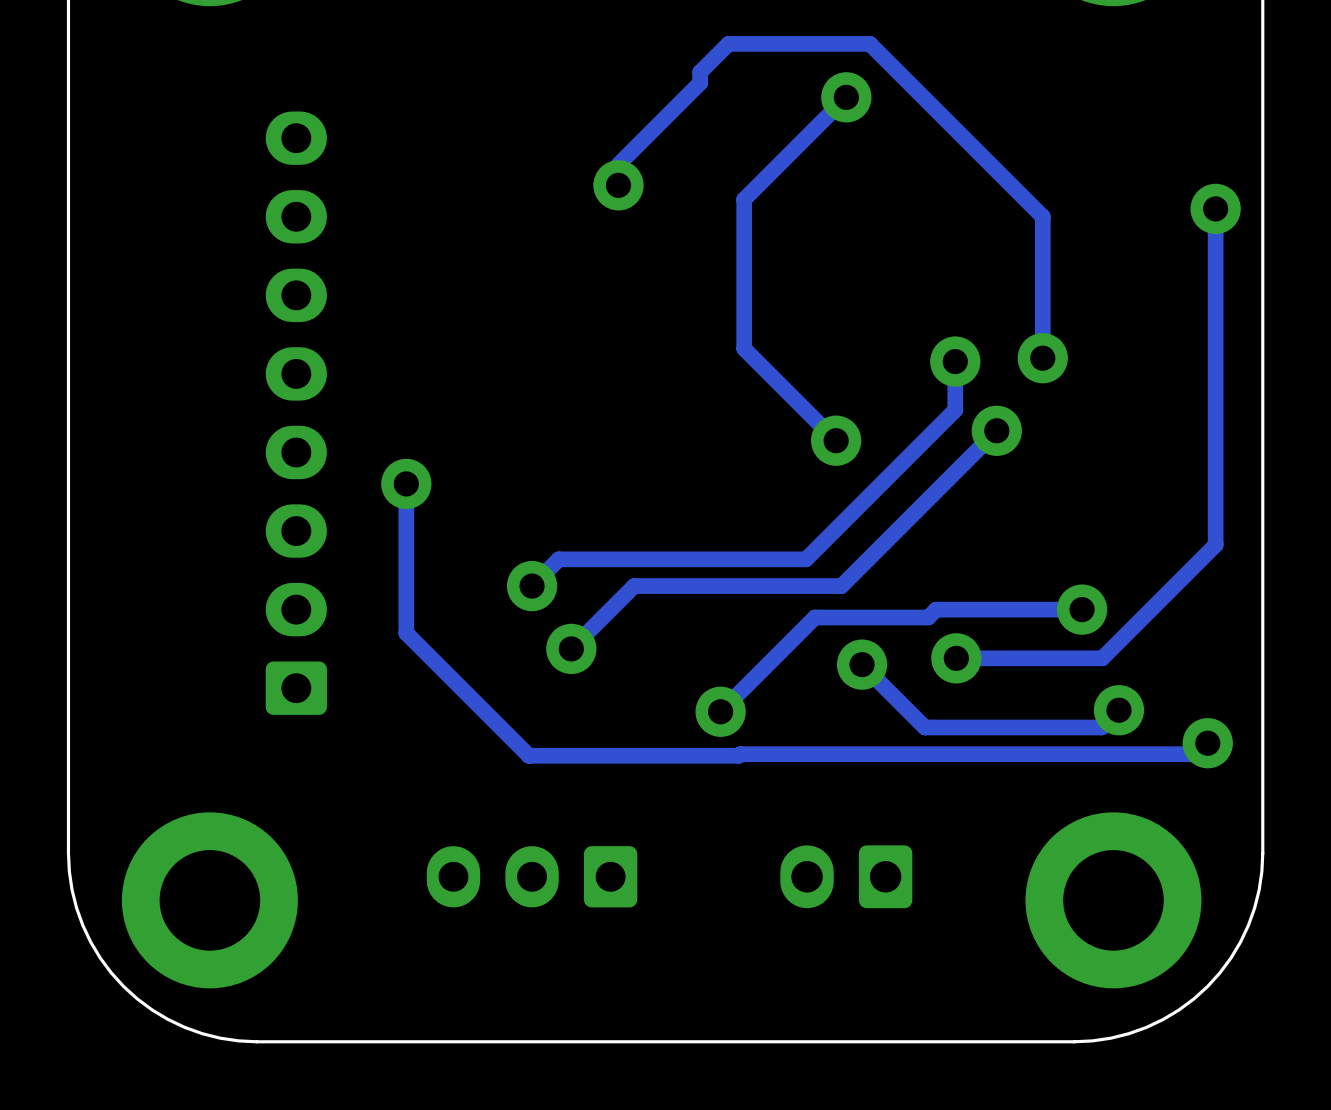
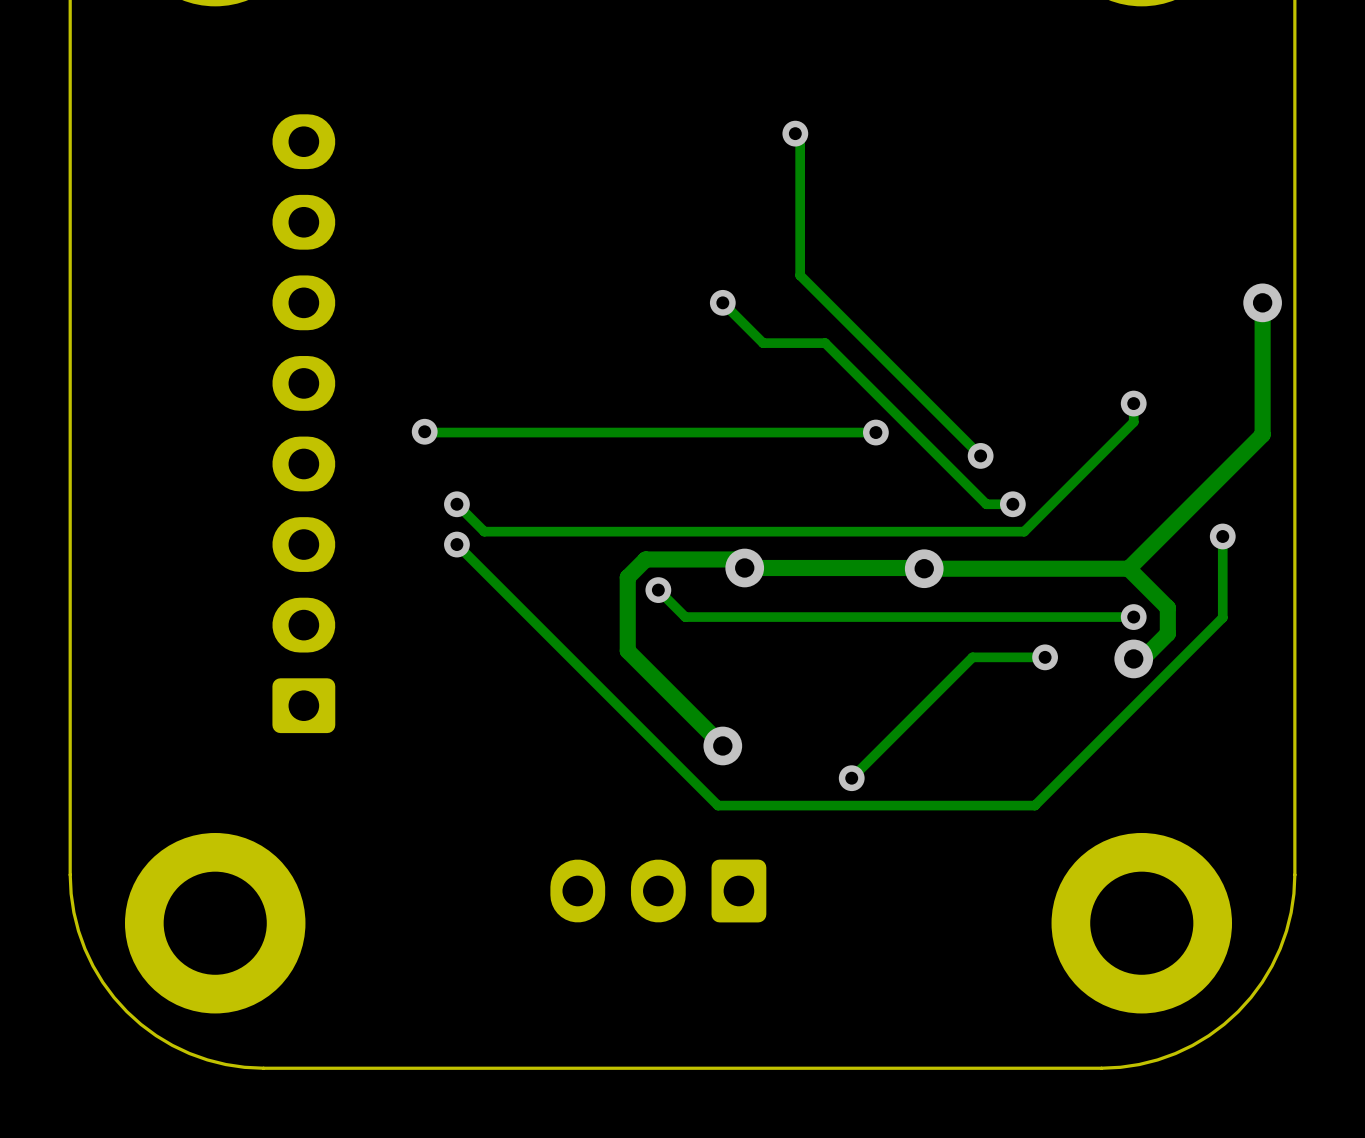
track: (846, 97) (744, 199) (744, 348) (836, 440) -> none
via: (846, 97) -> none
track: none -> (795, 133) (800, 138) (800, 275) (980, 455) (980, 447)
via: none -> (795, 133)
track: (618, 185) (618, 164) (700, 82) (700, 72) (728, 43) (869, 43) (1042, 216) (1042, 358) -> none
via: (618, 185) -> none
track: (1215, 208) (1215, 544) (1102, 658) (956, 658) -> none
via: (1215, 208) -> none
track: none -> (722, 302) (763, 343) (825, 343) (986, 504) (1012, 504)
via: none -> (722, 302)
track: none -> (1262, 302) (1262, 434) (1128, 568)
via: none -> (1262, 302)
via: (1042, 358) -> none
track: (955, 361) (955, 410) (806, 559) (558, 559) (532, 586) -> none
via: (955, 361) -> none
track: none -> (1133, 403) (1133, 422) (1024, 531) (484, 531) (456, 504)
via: none -> (1133, 403)
via size: [811, 415, 862, 466] -> [863, 419, 889, 446]
track: none -> (424, 431) (875, 432)
via: none -> (424, 431)
track: (996, 430) (841, 586) (634, 586) (571, 648) -> none
via: (996, 430) -> none
via: none -> (980, 455)
track: (406, 483) (406, 633) (528, 755) (1196, 754) (1207, 743) -> none
via: (406, 483) -> none
via: none -> (456, 504)
via: none -> (1012, 504)
track: none -> (1222, 536) (1222, 617) (1034, 805) (717, 805) (456, 544)
via: none -> (1222, 536)
via: none -> (456, 544)
via: none -> (744, 567)
via: none -> (924, 568)
track: none -> (1128, 568) (1167, 607) (1167, 633) (1142, 658) (1133, 658)
track: none -> (1128, 568) (744, 567) (736, 559) (645, 559) (627, 577) (627, 650) (722, 745)
track: none -> (658, 590) (685, 617) (1133, 617)
via: none -> (658, 590)
via: (532, 586) -> none
via: none -> (1133, 617)
track: (1082, 609) (936, 609) (928, 617) (814, 617) (720, 711) -> none
via: (1082, 609) -> none
track: none -> (1045, 657) (972, 657) (851, 778)
via: none -> (1045, 657)
via: none -> (1133, 658)
via: (571, 648) -> none
via: (956, 658) -> none
track: (862, 664) (924, 727) (1101, 727) (1118, 710) -> none
via: (862, 664) -> none
via size: [695, 686, 746, 737] -> [703, 726, 743, 766]
via: (1118, 710) -> none
via: (1207, 743) -> none
via: none -> (851, 778)
part position: (532, 876) -> (658, 891)
part: (846, 876) -> none

